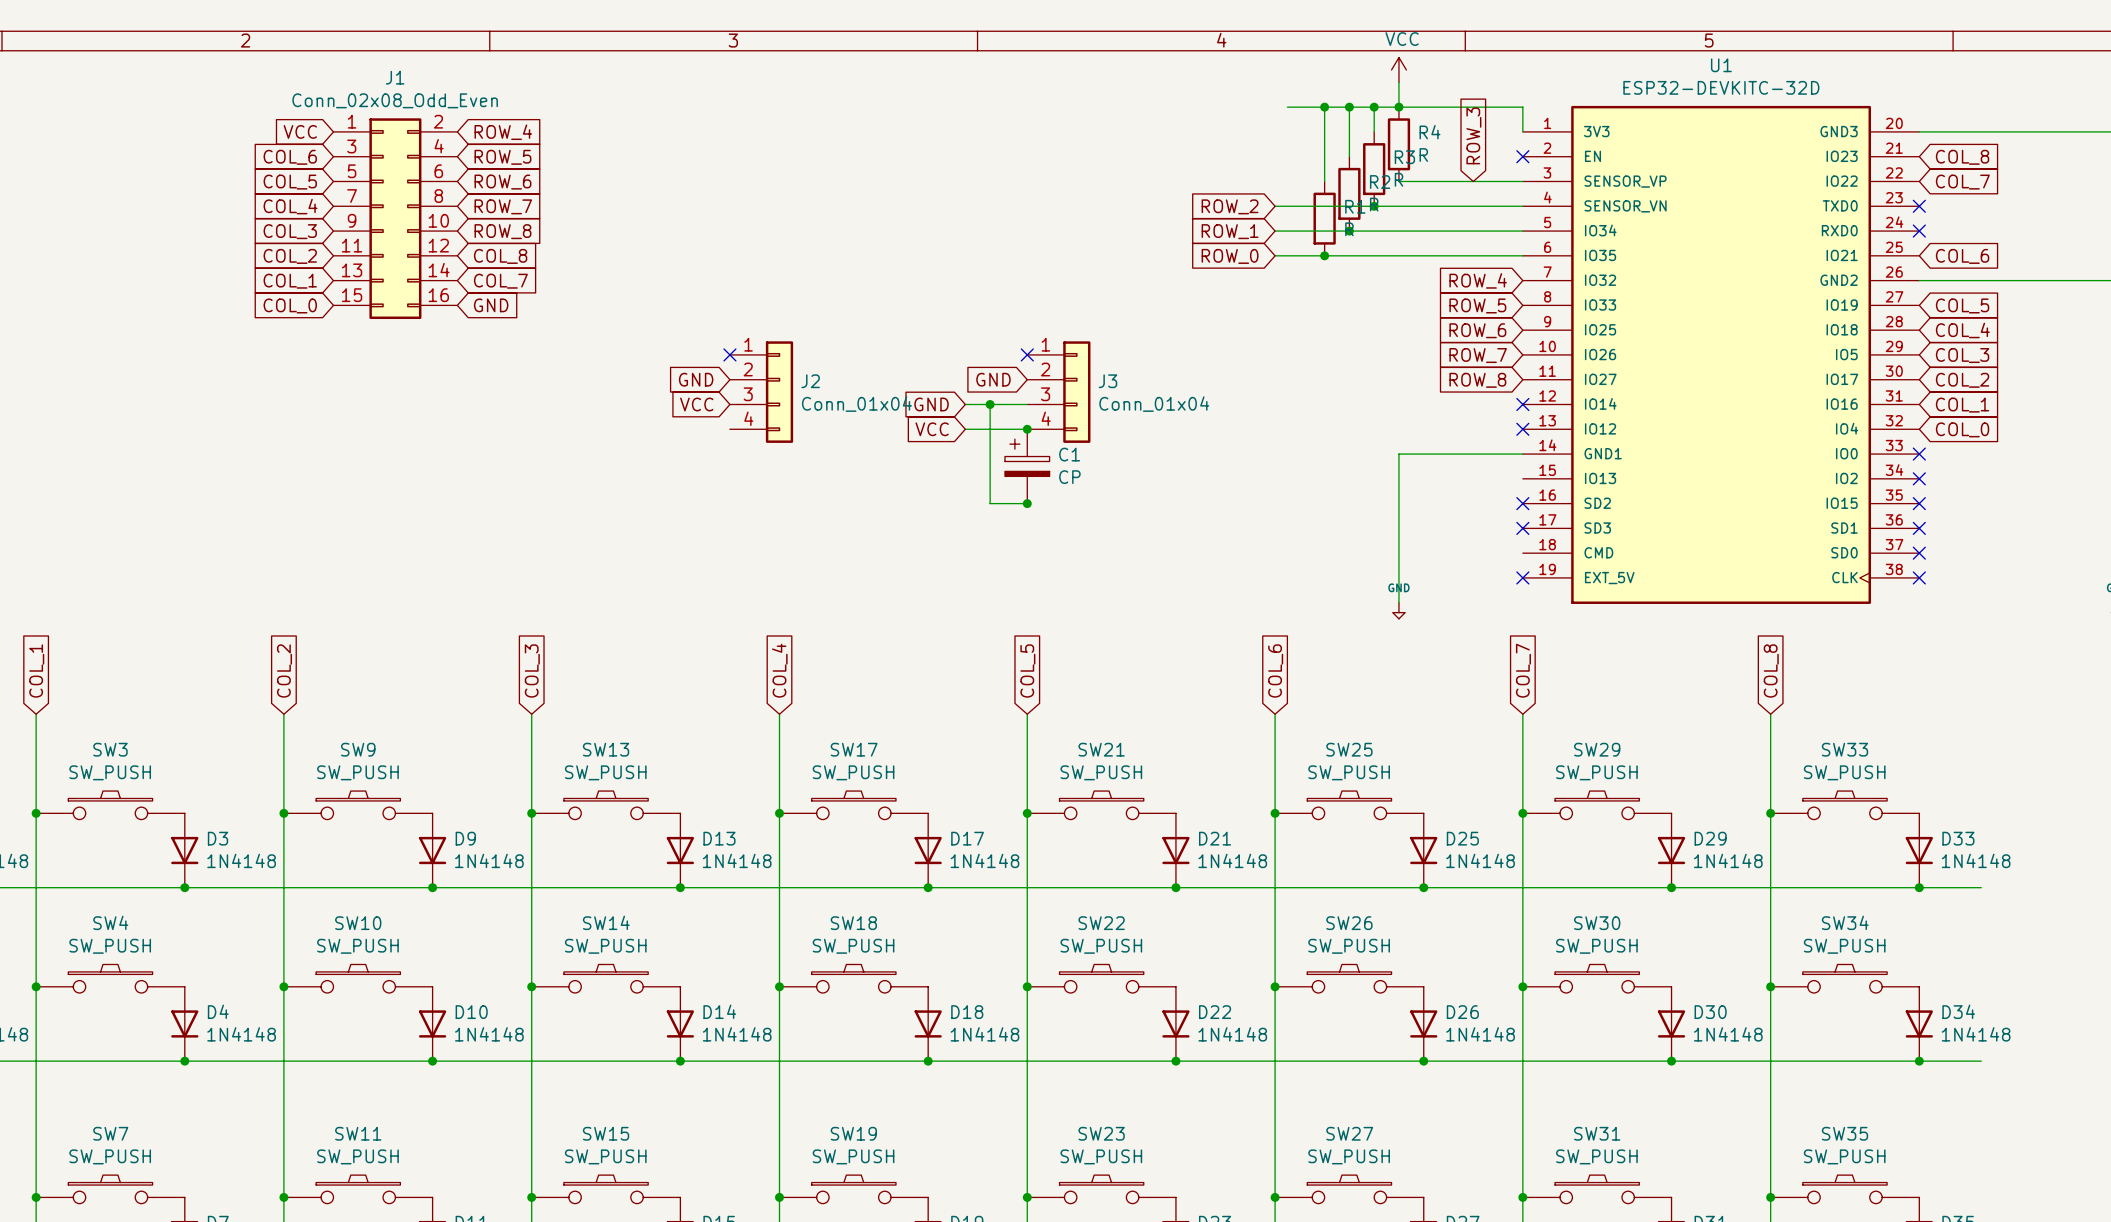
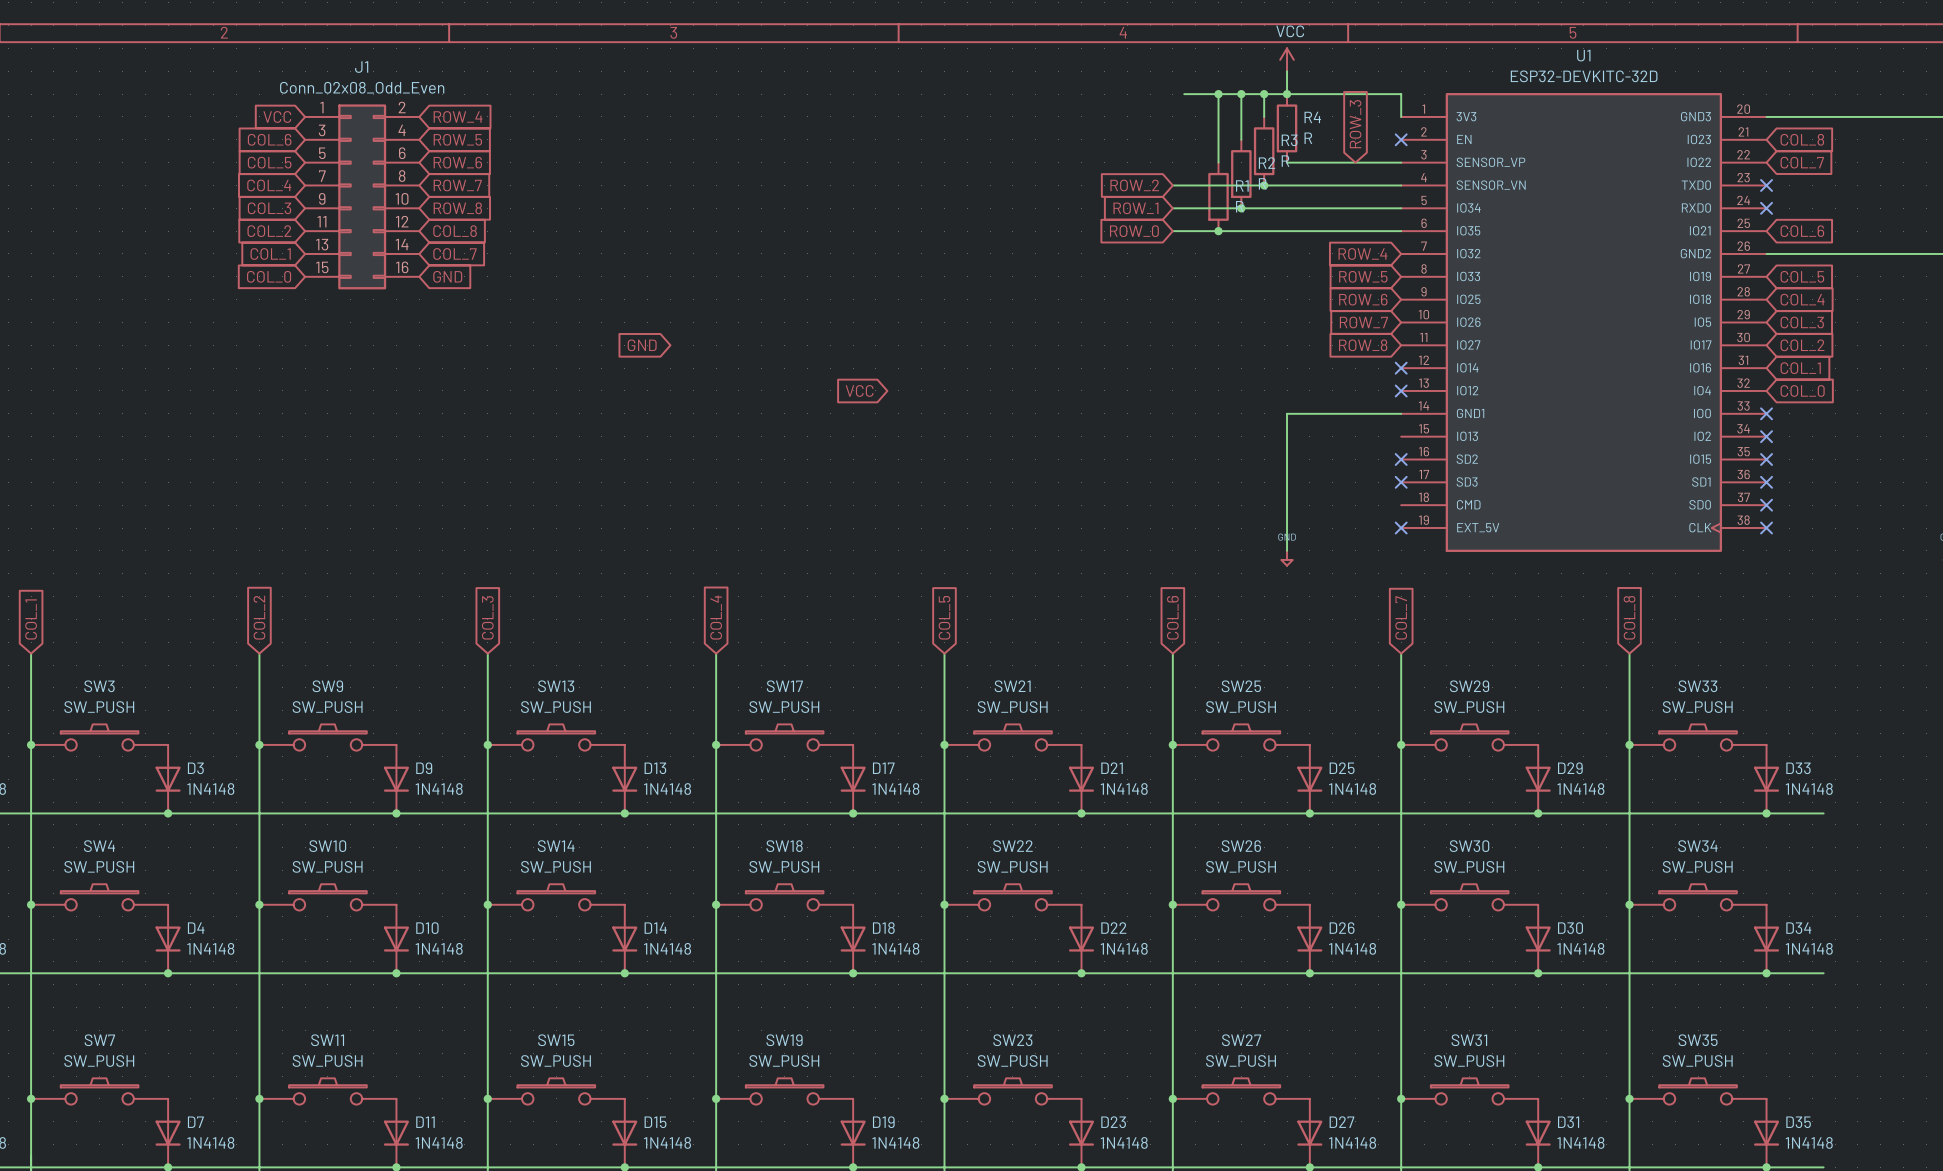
no-connect mark: (729, 354) -> none
no-connect mark: (1027, 354) -> none
global label: GND (993, 379) -> none
J2: Conn_01x04 (761, 392) -> none
J3: Conn_01x04 (1058, 392) -> none
global label: VCC (696, 404) -> none
global label: GND (931, 404) -> none
wire: (965, 404) (1027, 404) -> none
wire: (990, 404) (990, 503) (1027, 503) -> none
junction: (990, 404) -> none
wire: (965, 429) (1027, 429) -> none
junction: (1027, 429) -> none
C1: CP (1027, 466) -> none
junction: (1027, 503) -> none

